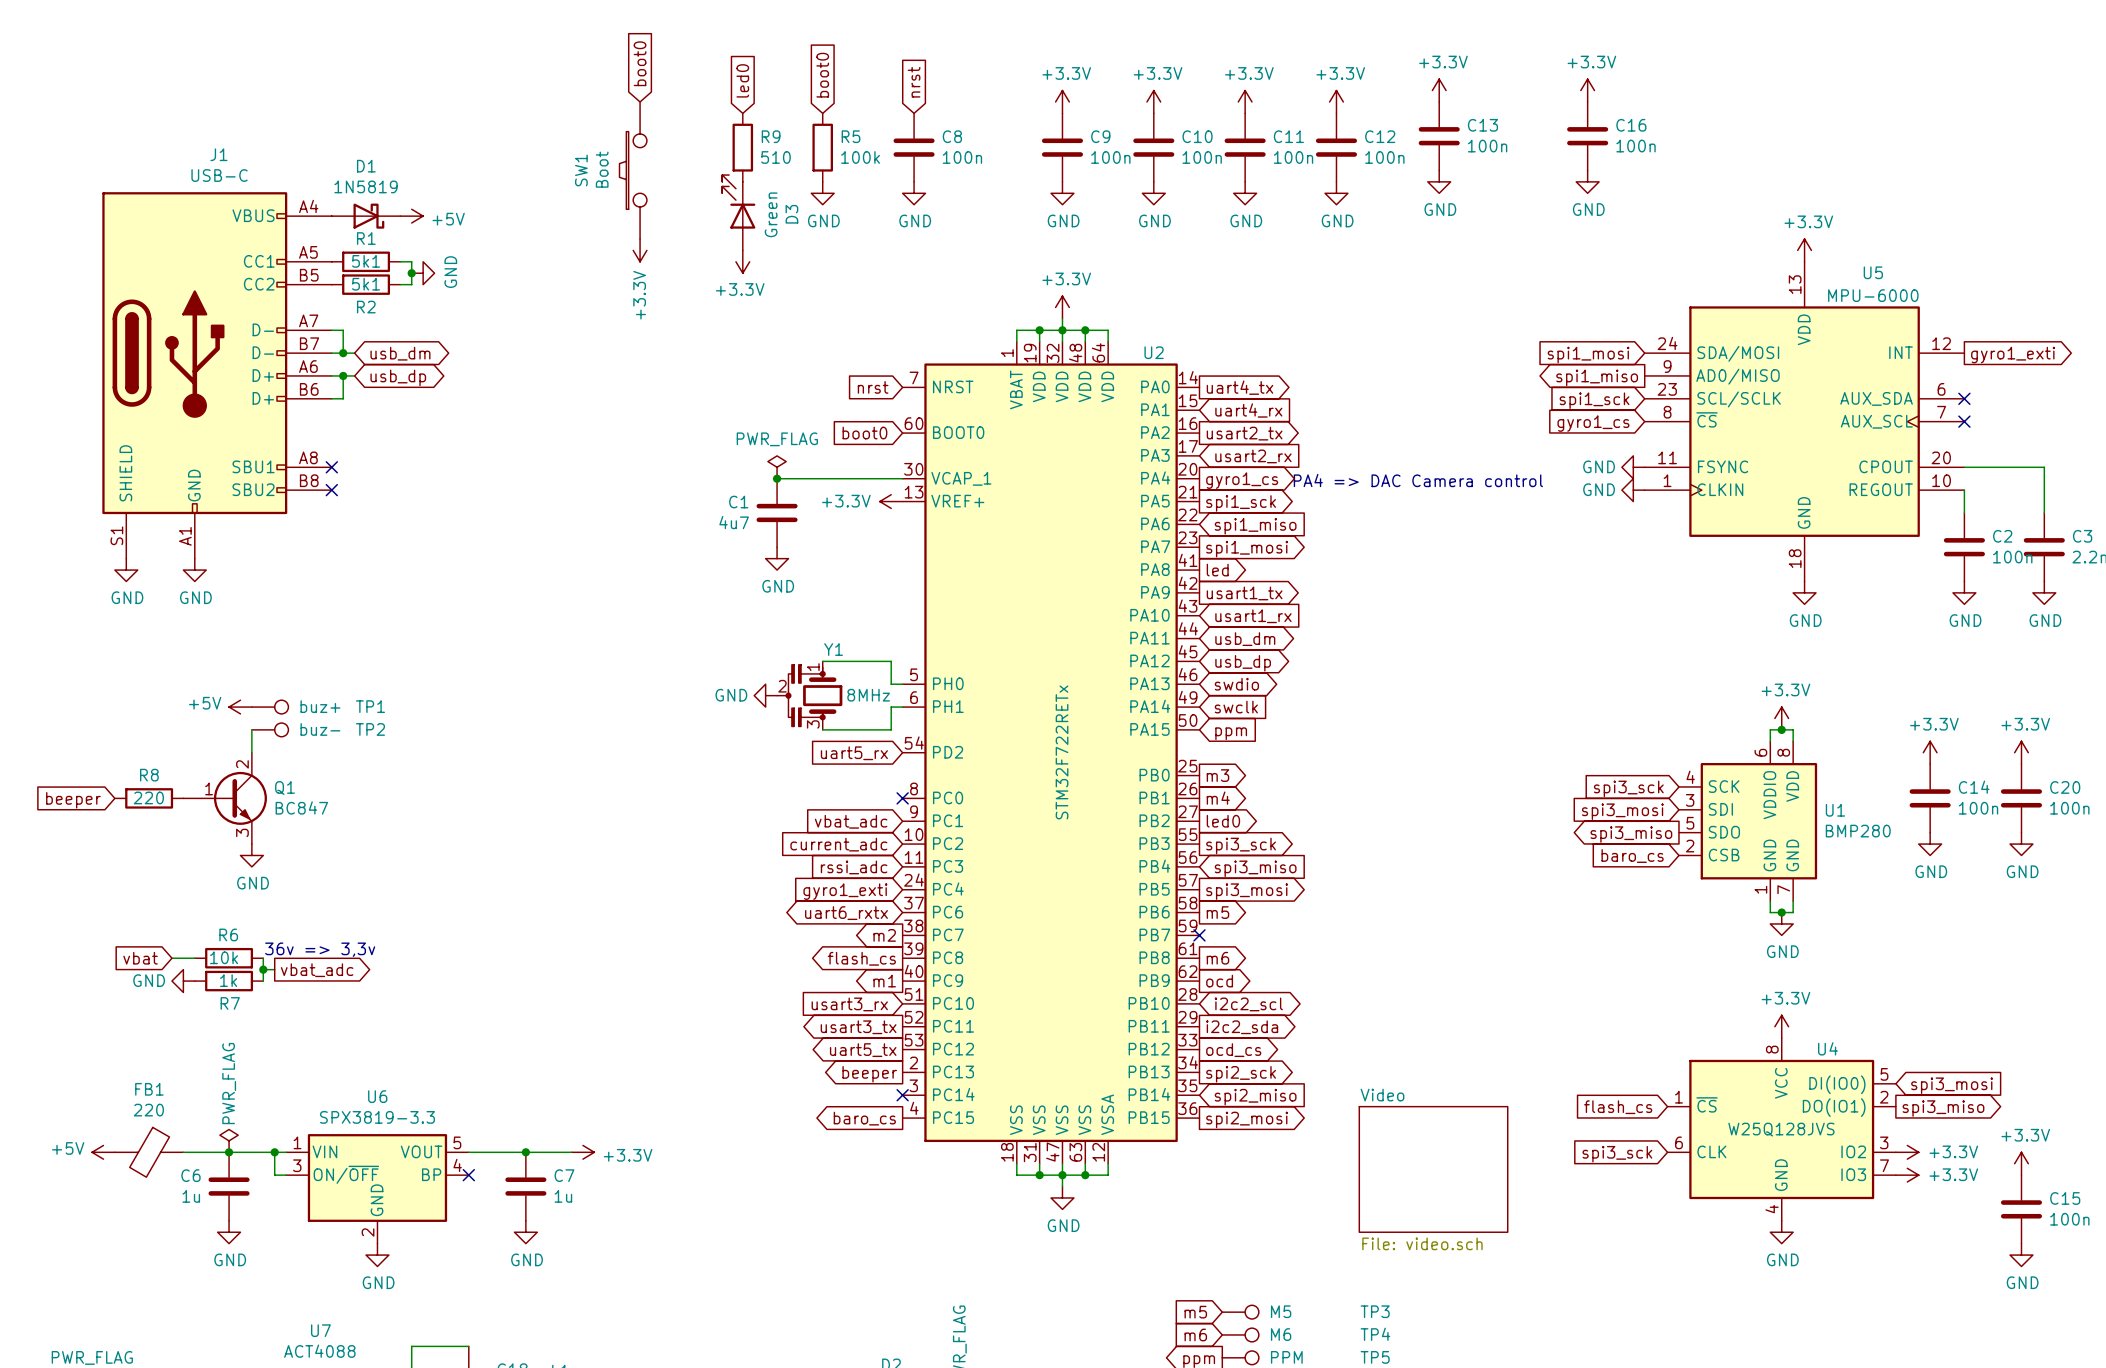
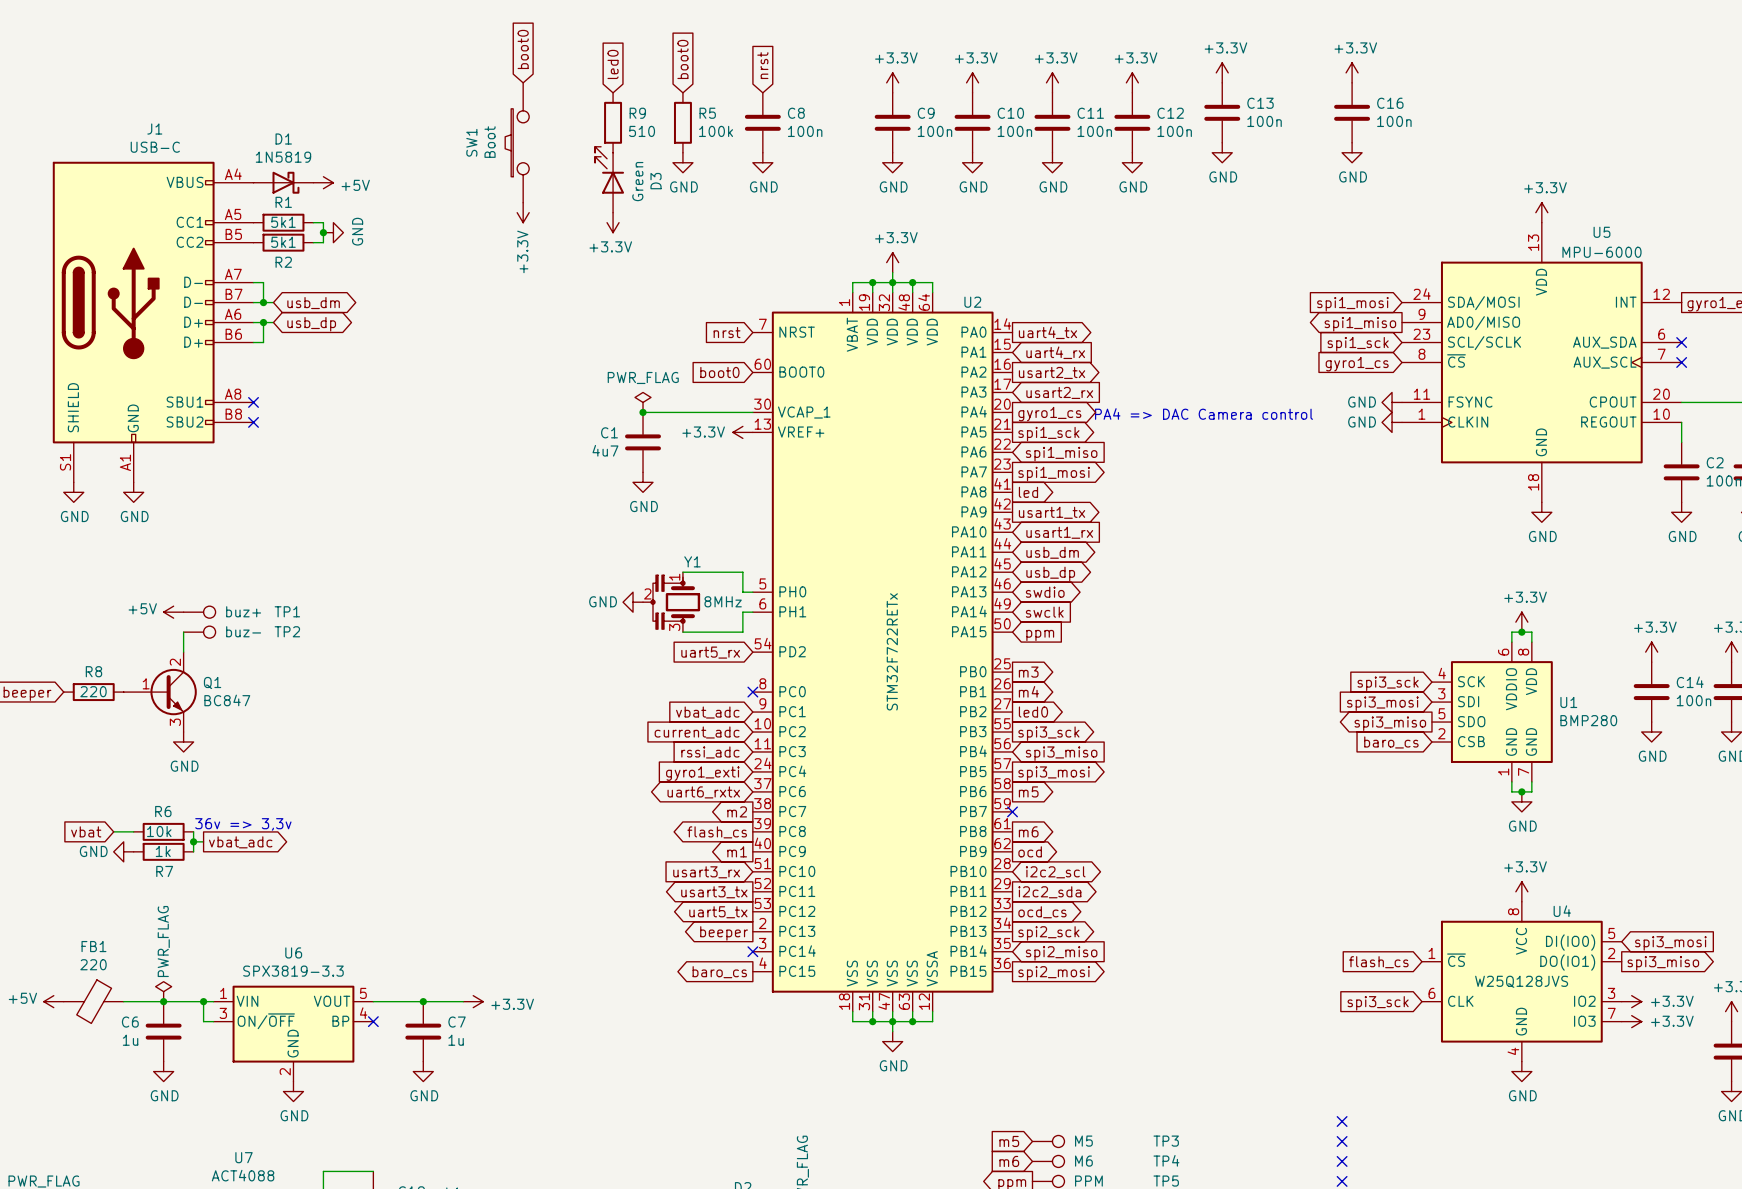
sheet Video: File: video.sch (1433, 1169) -> none
no-connect mark: none -> (1342, 1121)
no-connect mark: none -> (1342, 1141)
no-connect mark: none -> (1342, 1161)
no-connect mark: none -> (1342, 1181)

